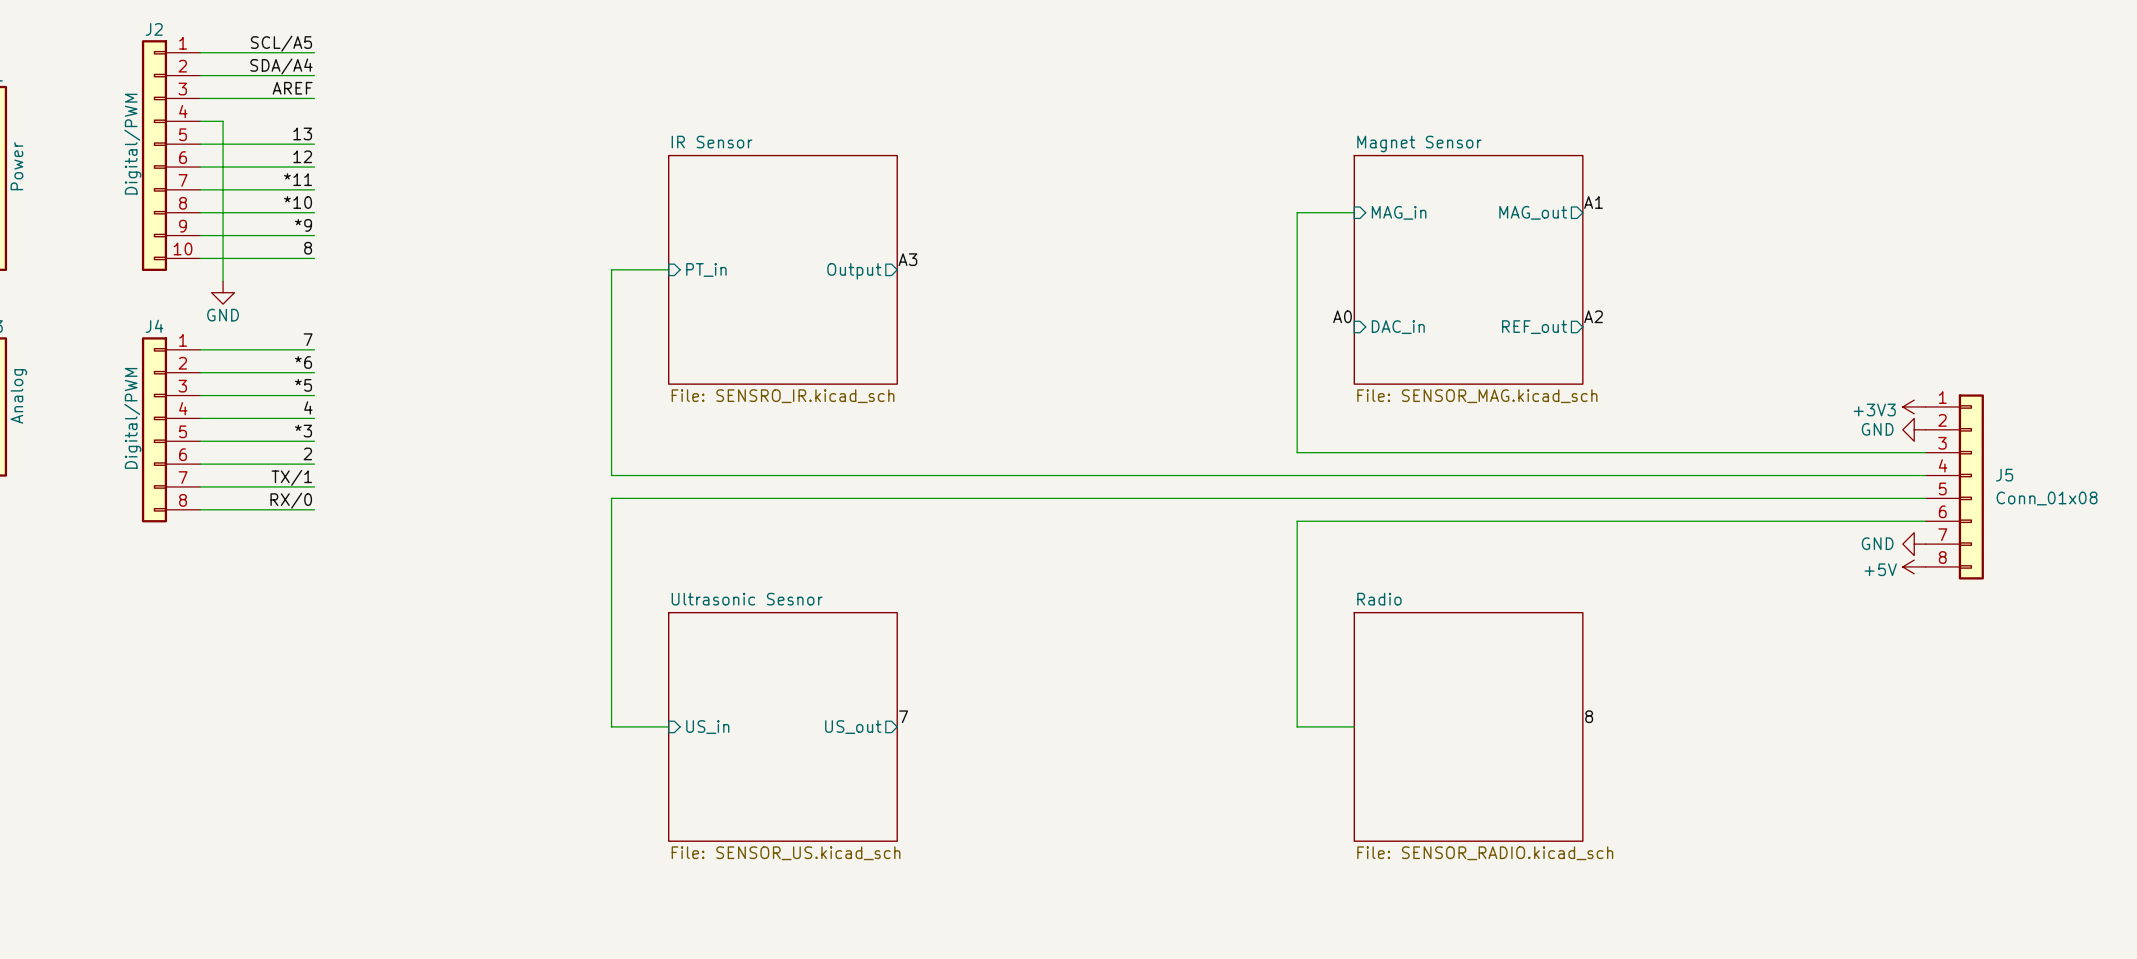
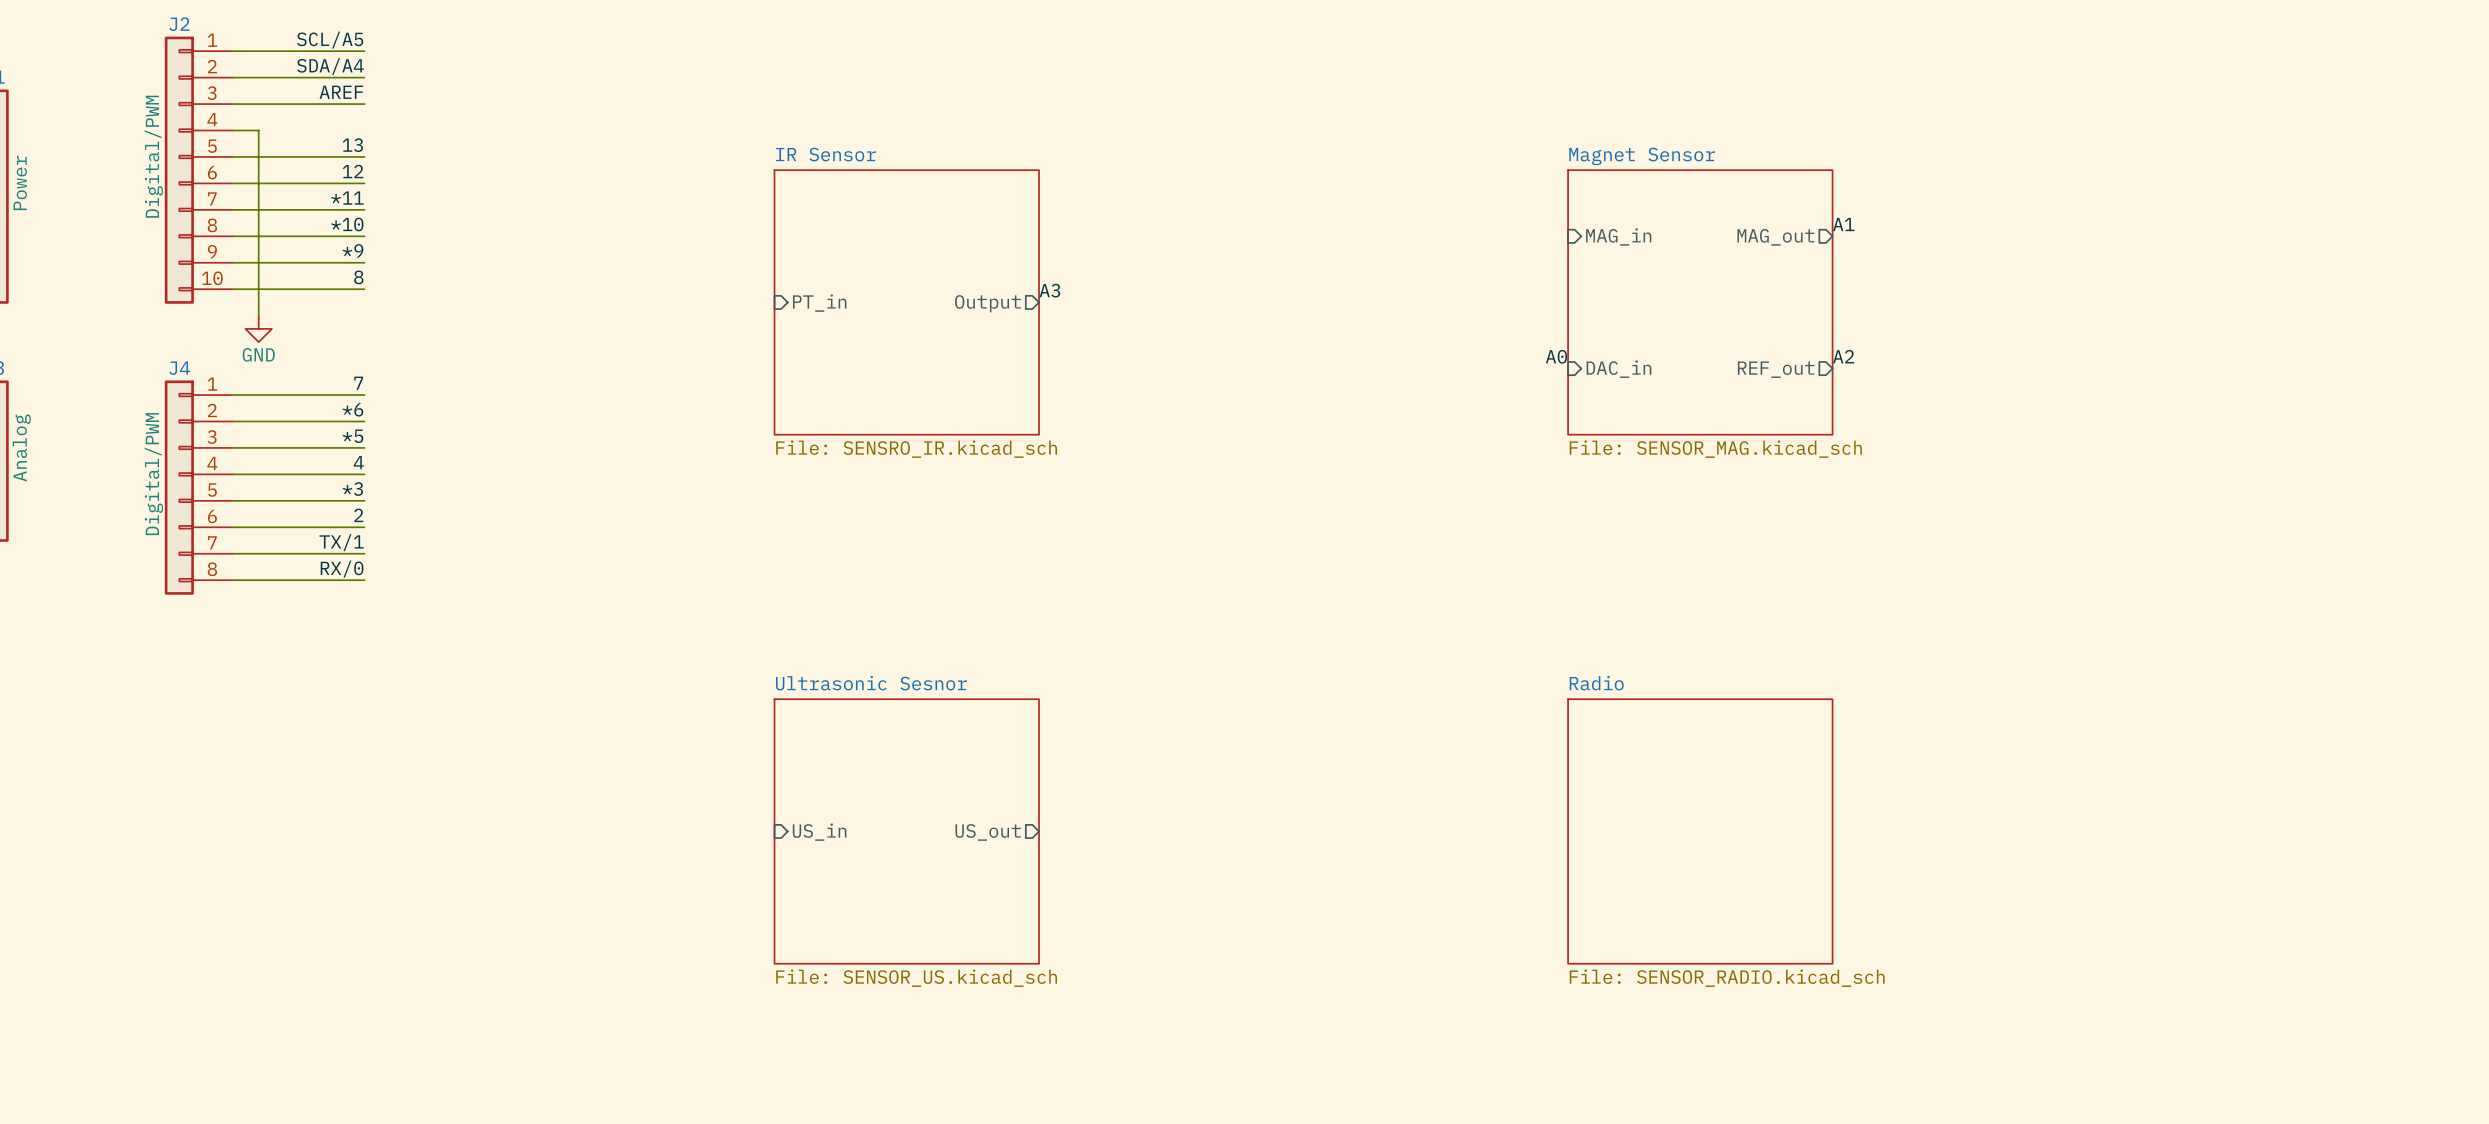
wire: (1354, 212) (1297, 212) (1297, 452) (1925, 452) -> none
wire: (668, 269) (611, 269) (611, 475) (1925, 475) -> none
power symbol: +3V3 (1914, 406) -> none
power symbol: GND (1914, 429) -> none
J5: Conn_01x08 (1954, 486) -> none
wire: (1925, 498) (611, 498) (611, 726) (668, 726) -> none
wire: (1925, 521) (1297, 521) (1297, 726) (1354, 726) -> none
power symbol: GND (1914, 544) -> none
power symbol: +5V (1914, 566) -> none
label: 7 (903, 716) -> none
label: 8 (1589, 716) -> none

